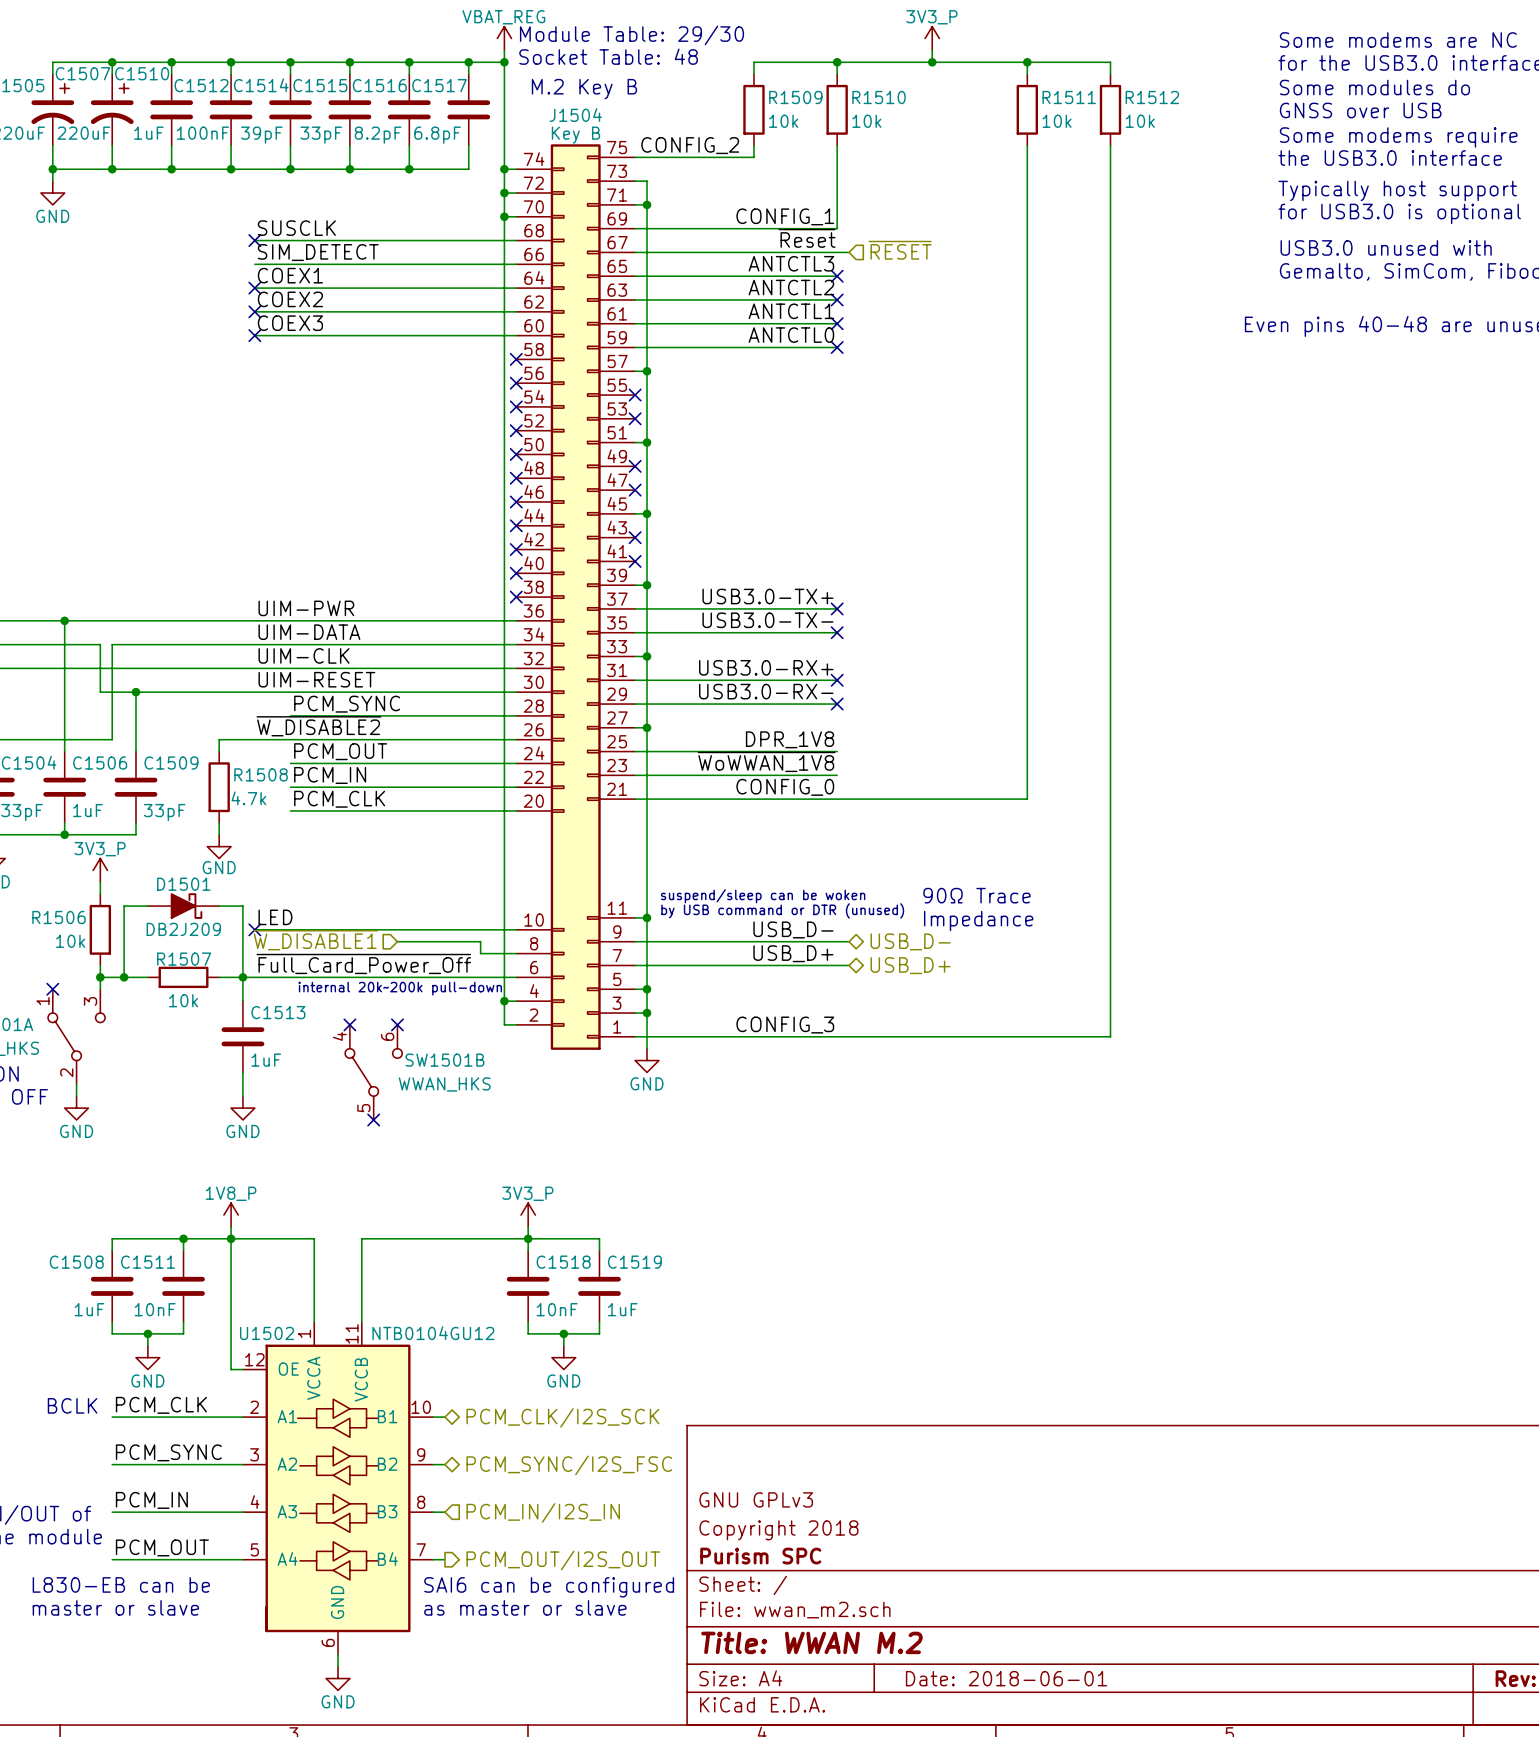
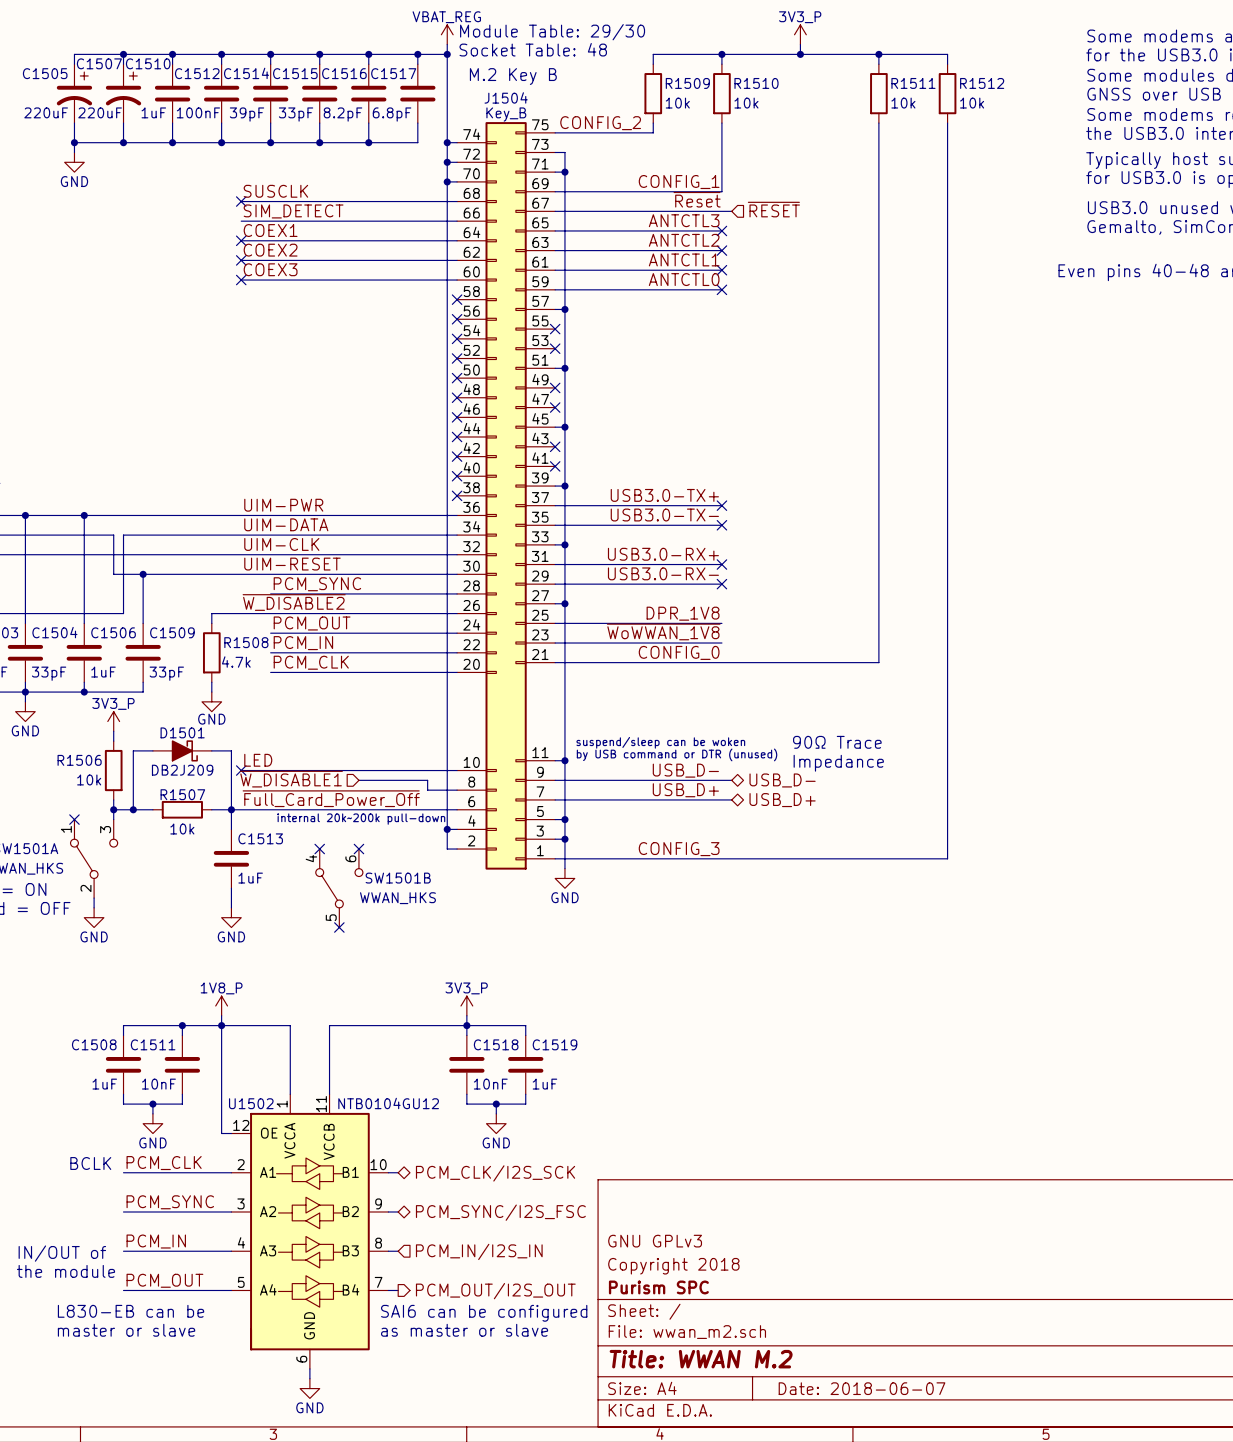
J1504 value: Key B (575, 135) -> Key_B (506, 114)
title block: Date: 2018-06-01 (1006, 1678) -> Date: 2018-06-07 (862, 1388)

